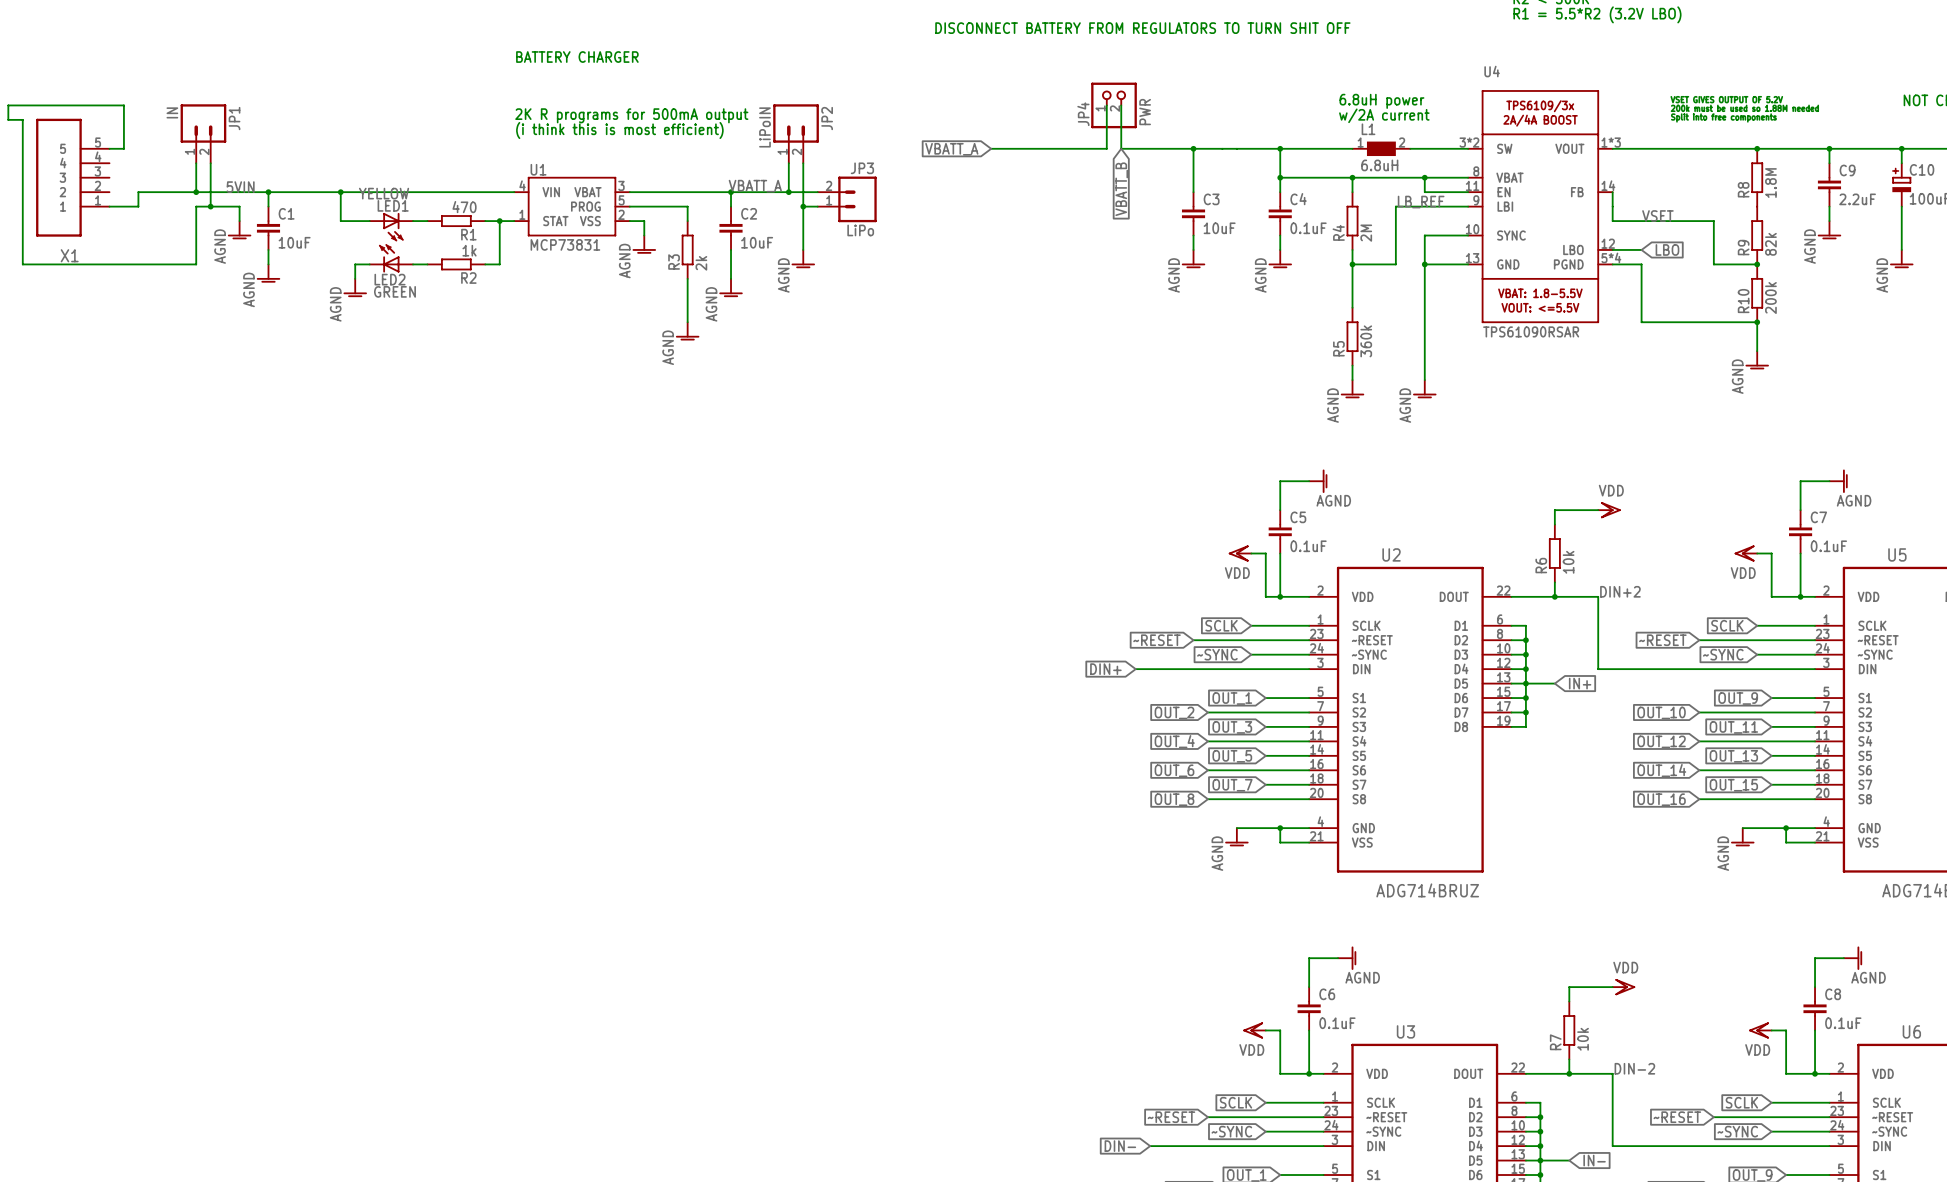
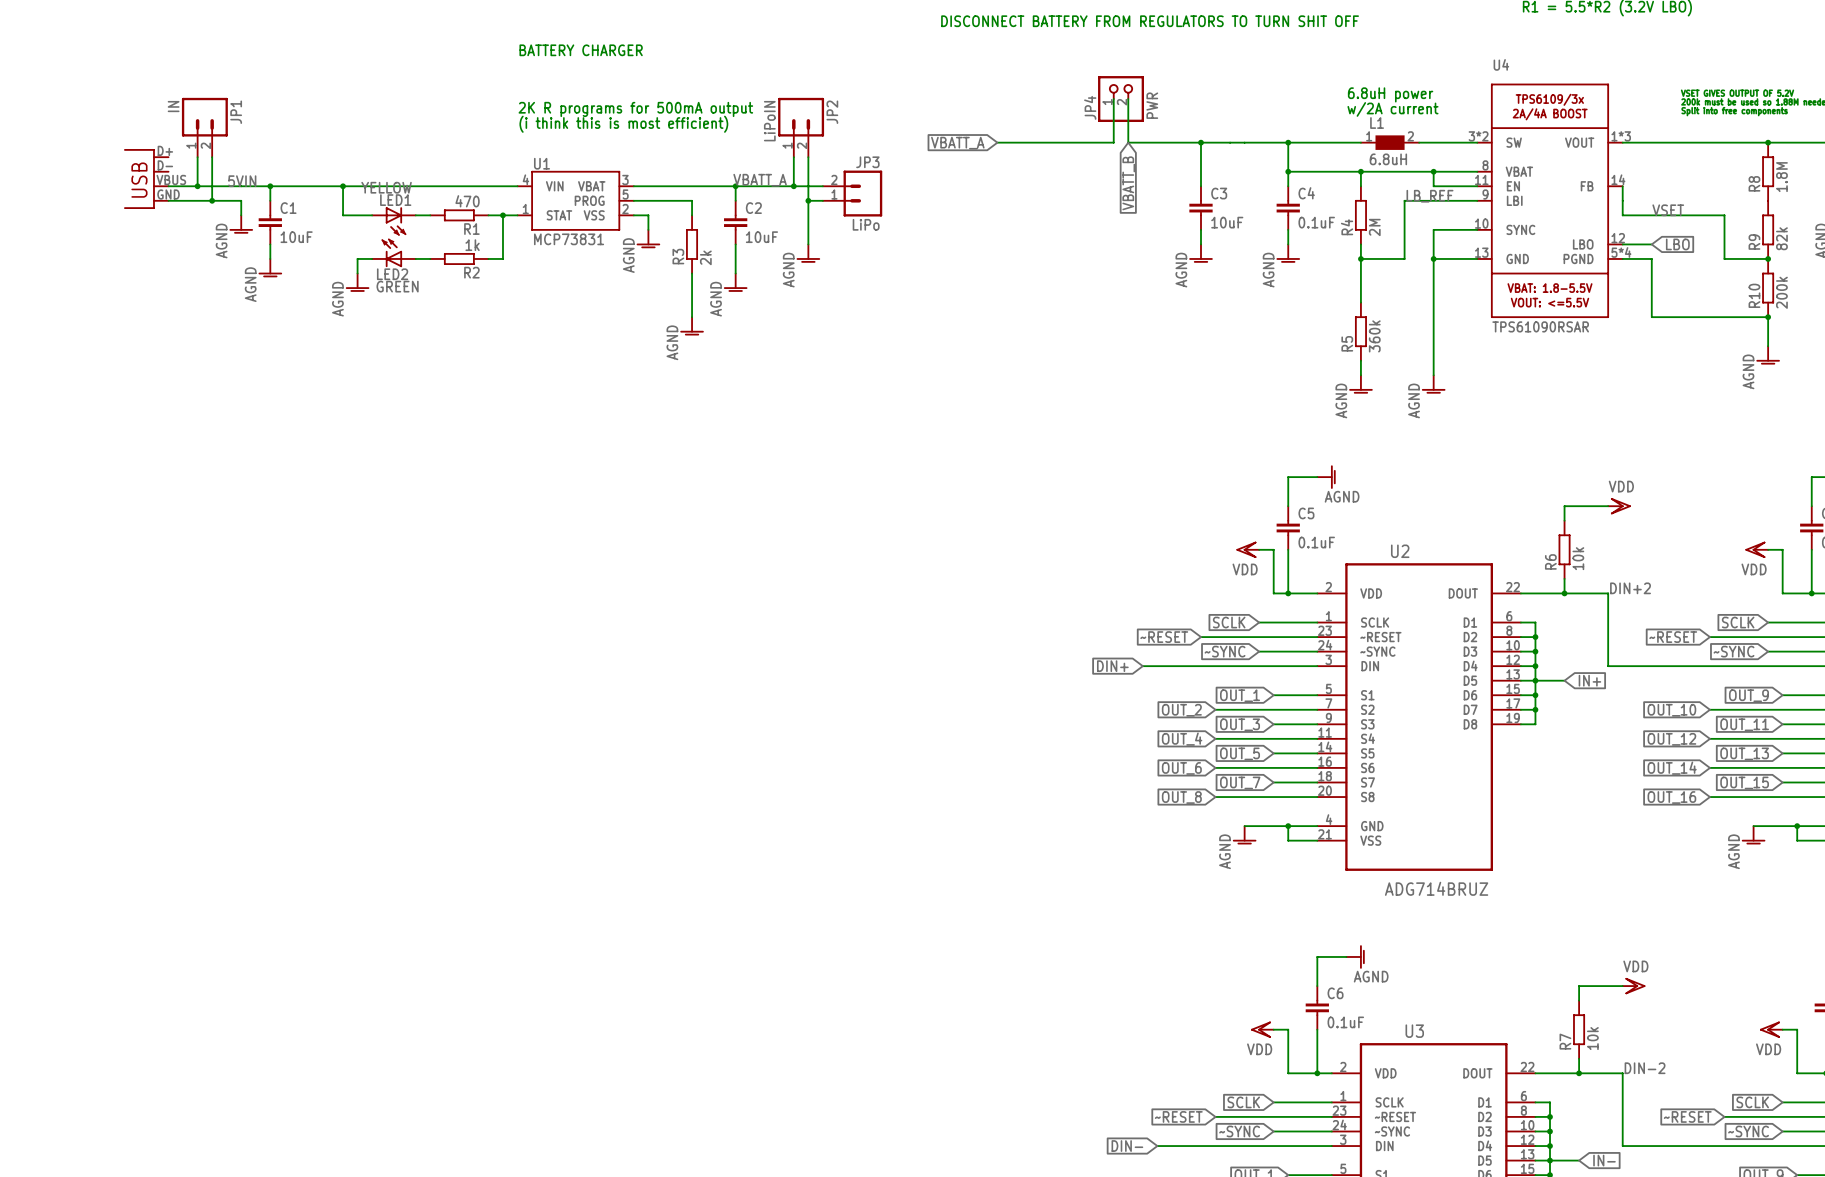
wire: (109, 148) (123, 148) (123, 105) (8, 105) (8, 119) (22, 119) (22, 264) (196, 264) (196, 206) -> (168, 200) (197, 200)
X1: (72, 177) -> none
part: none -> (146, 179)
wire: (167, 192) (138, 192) (138, 206) (109, 206) -> none

